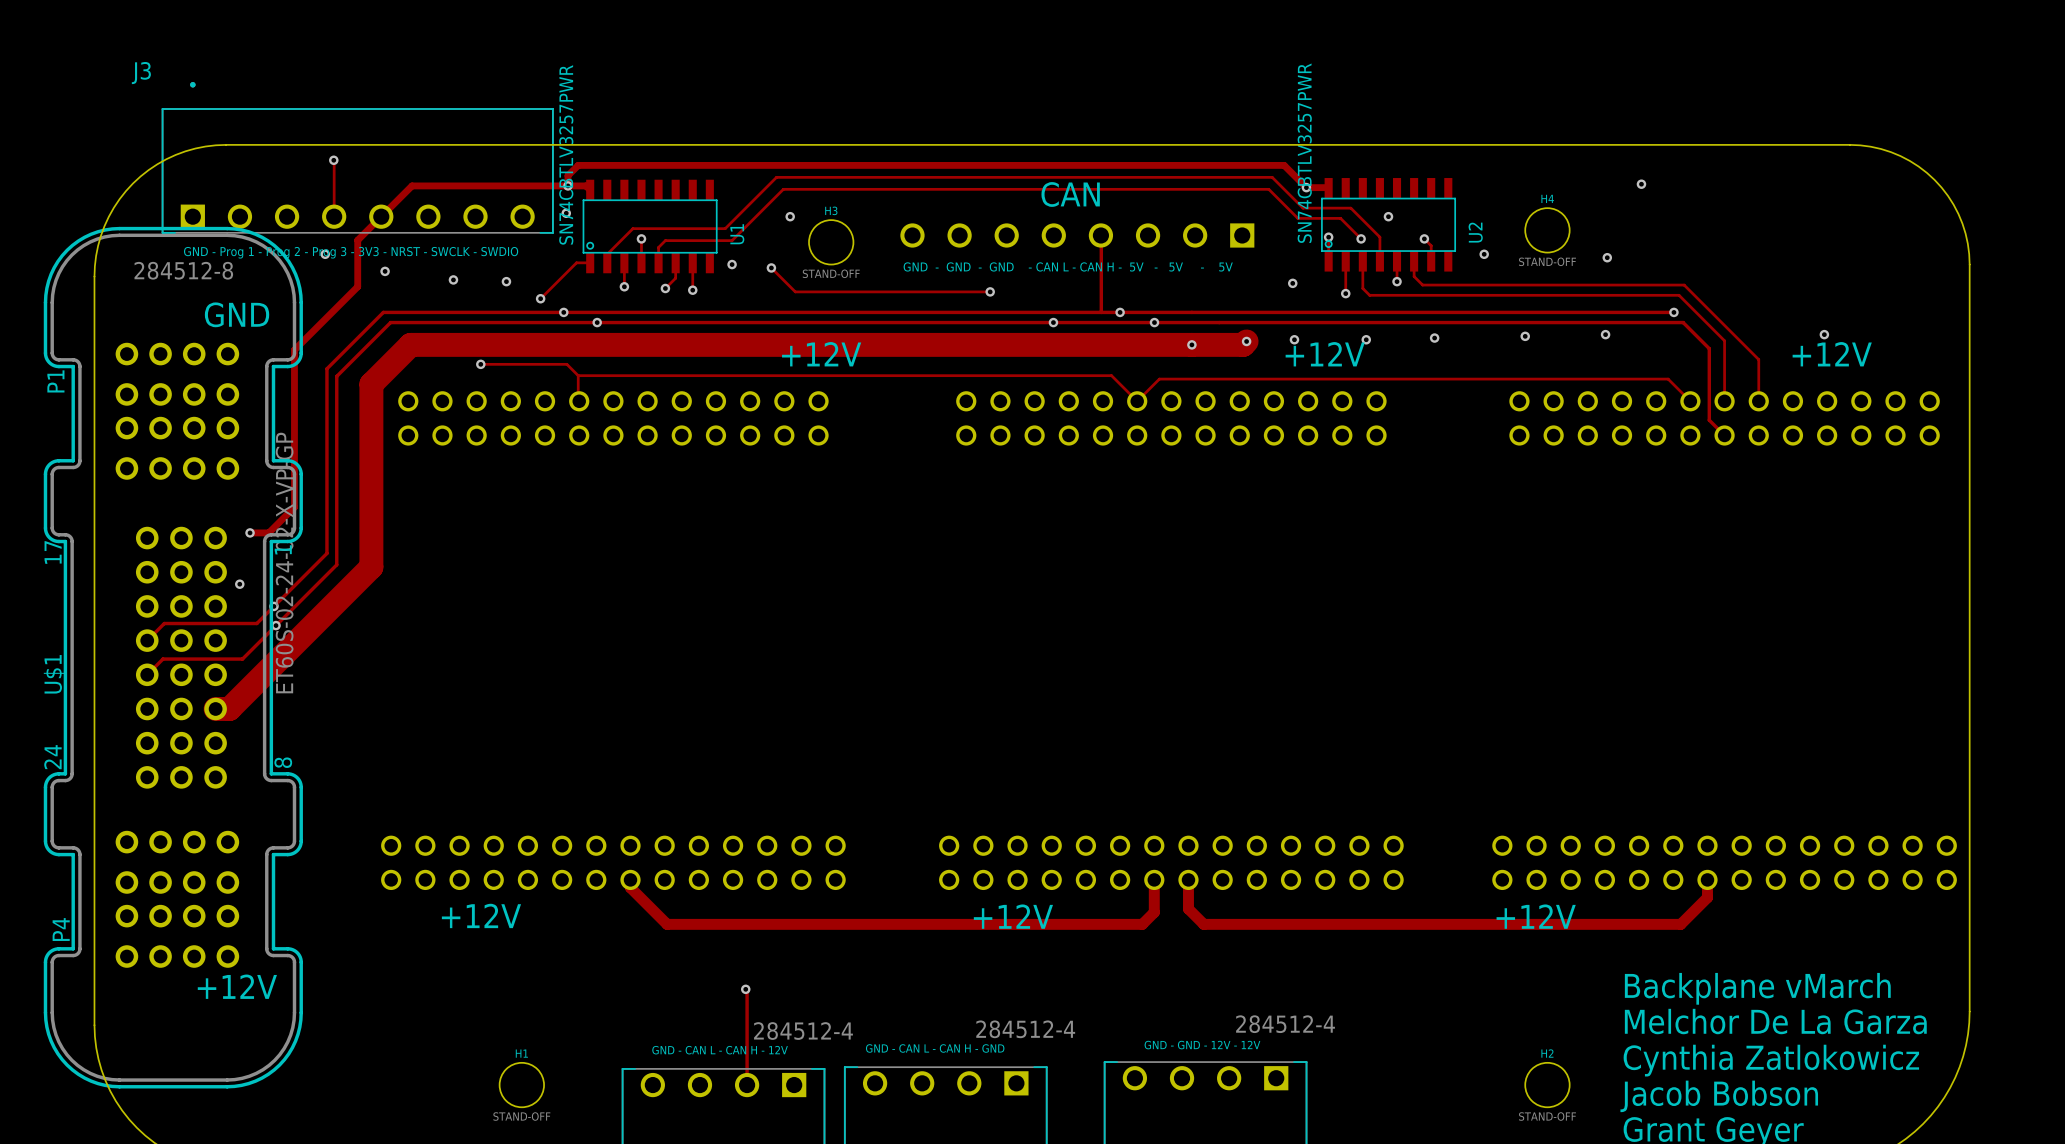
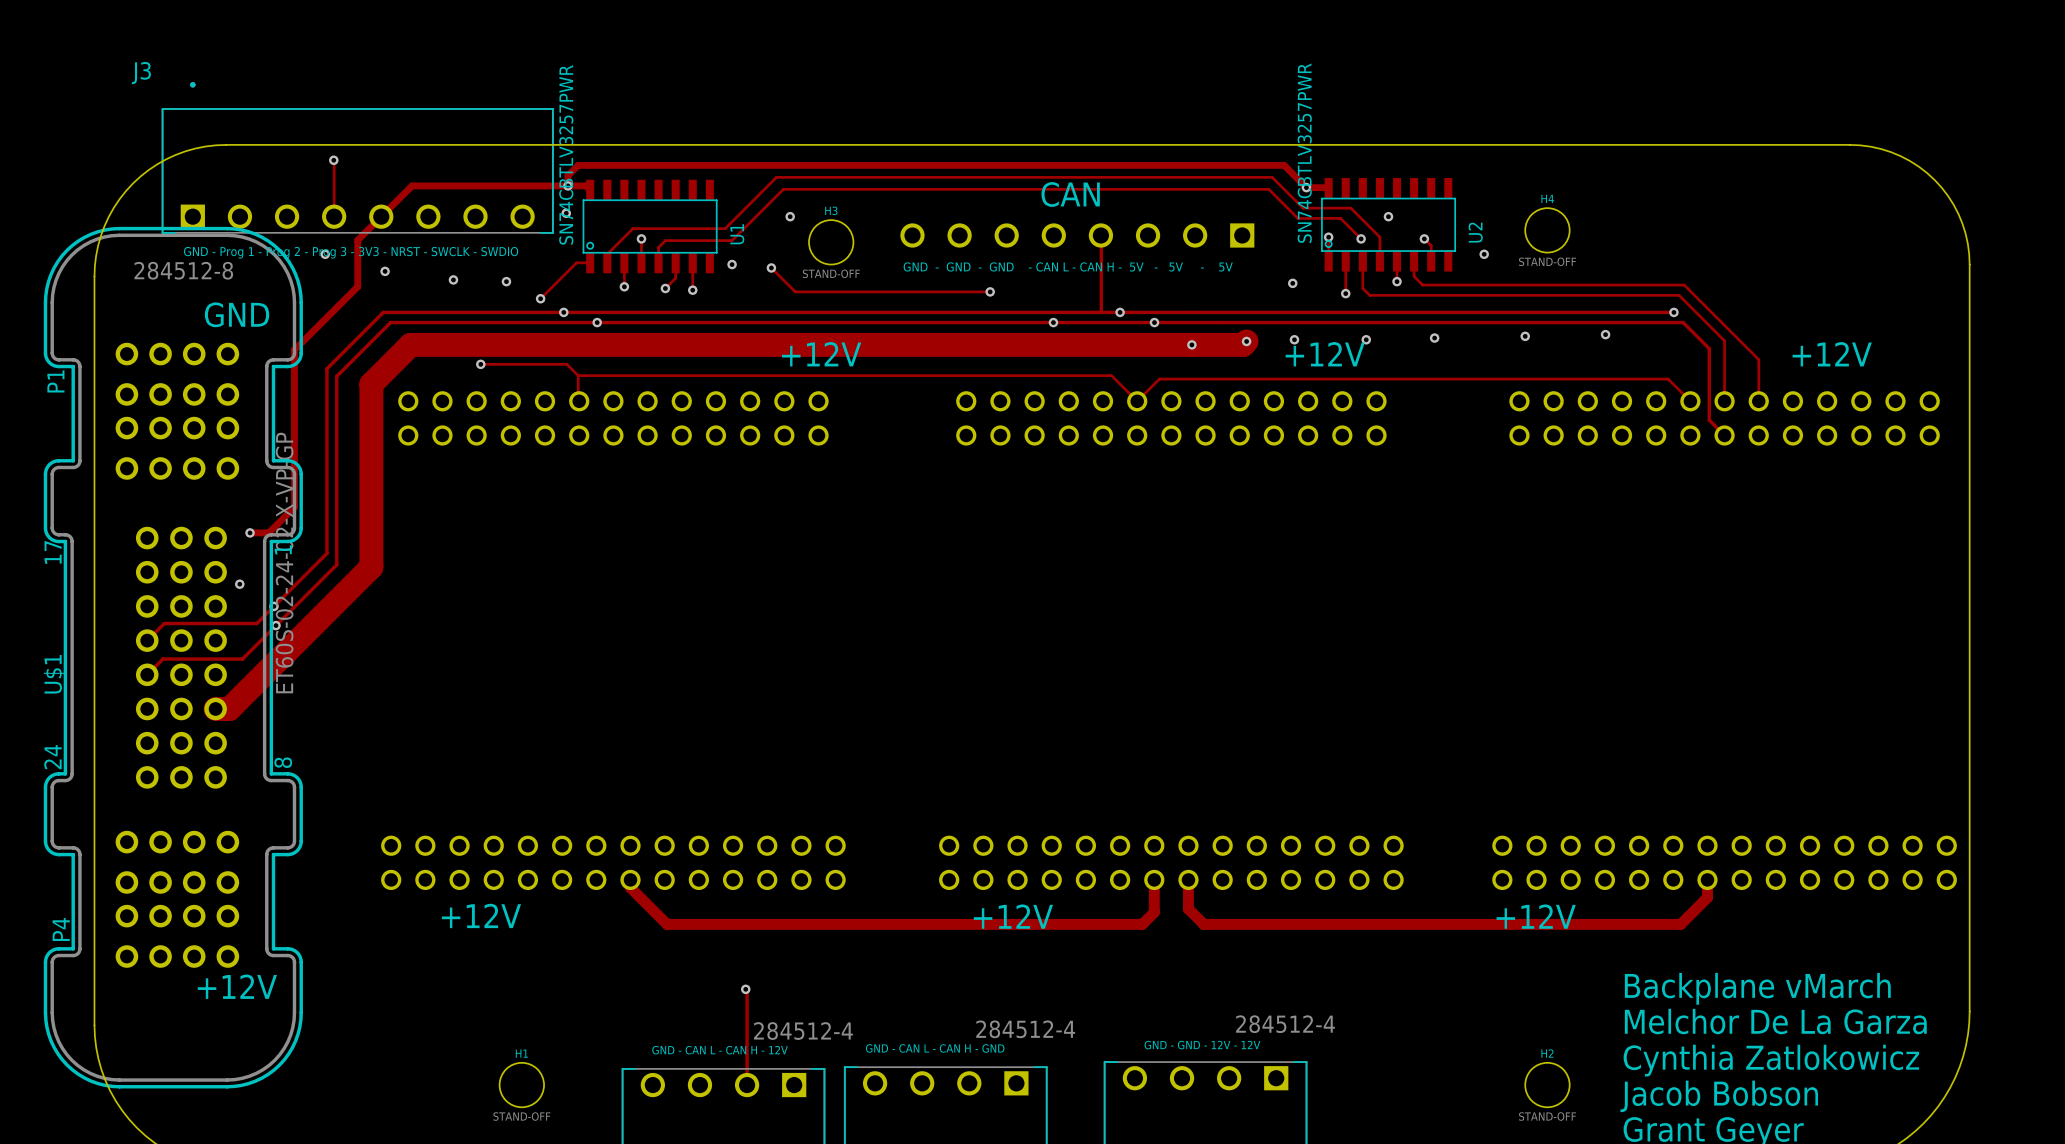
via: (1641, 184) -> none
via: (1607, 257) -> none
via: (1824, 334) -> none

